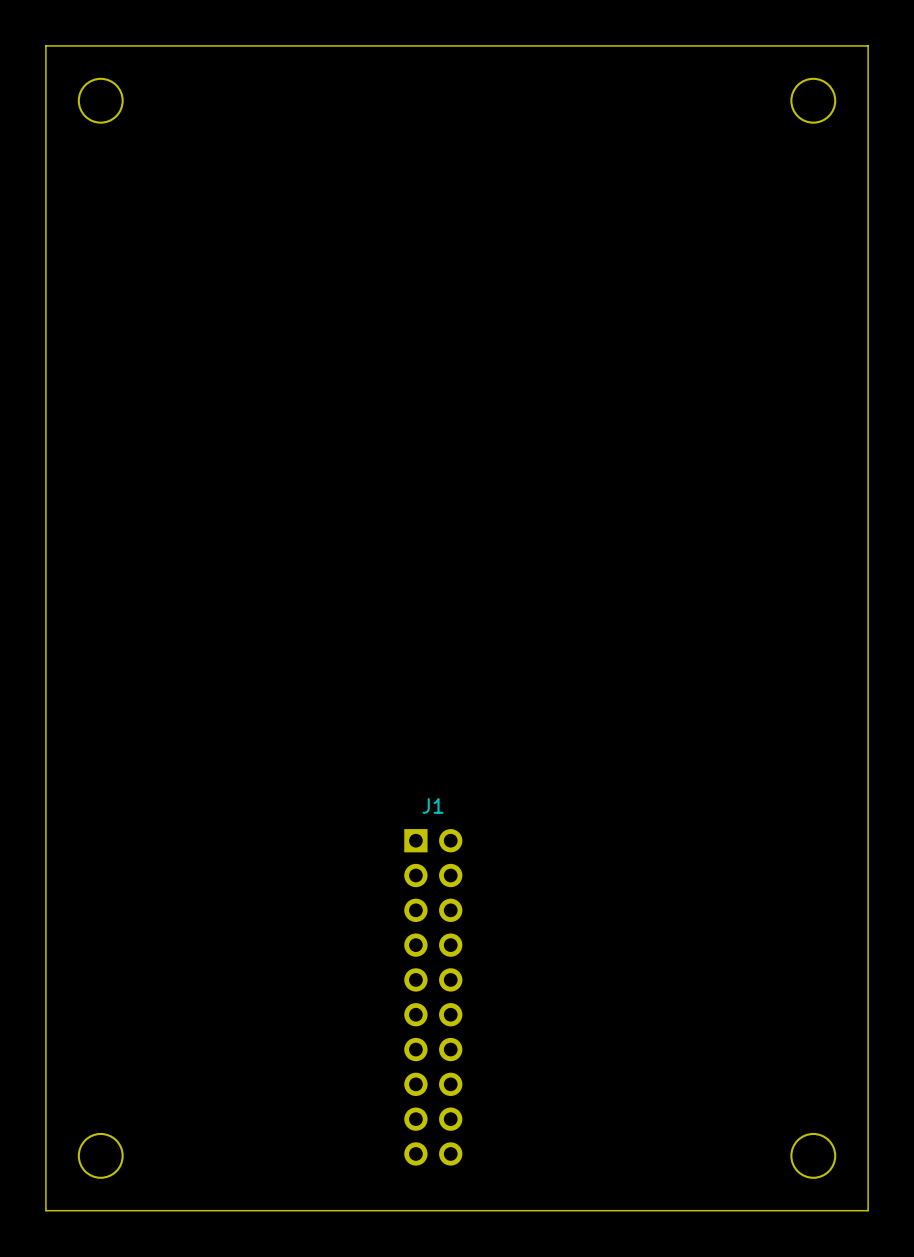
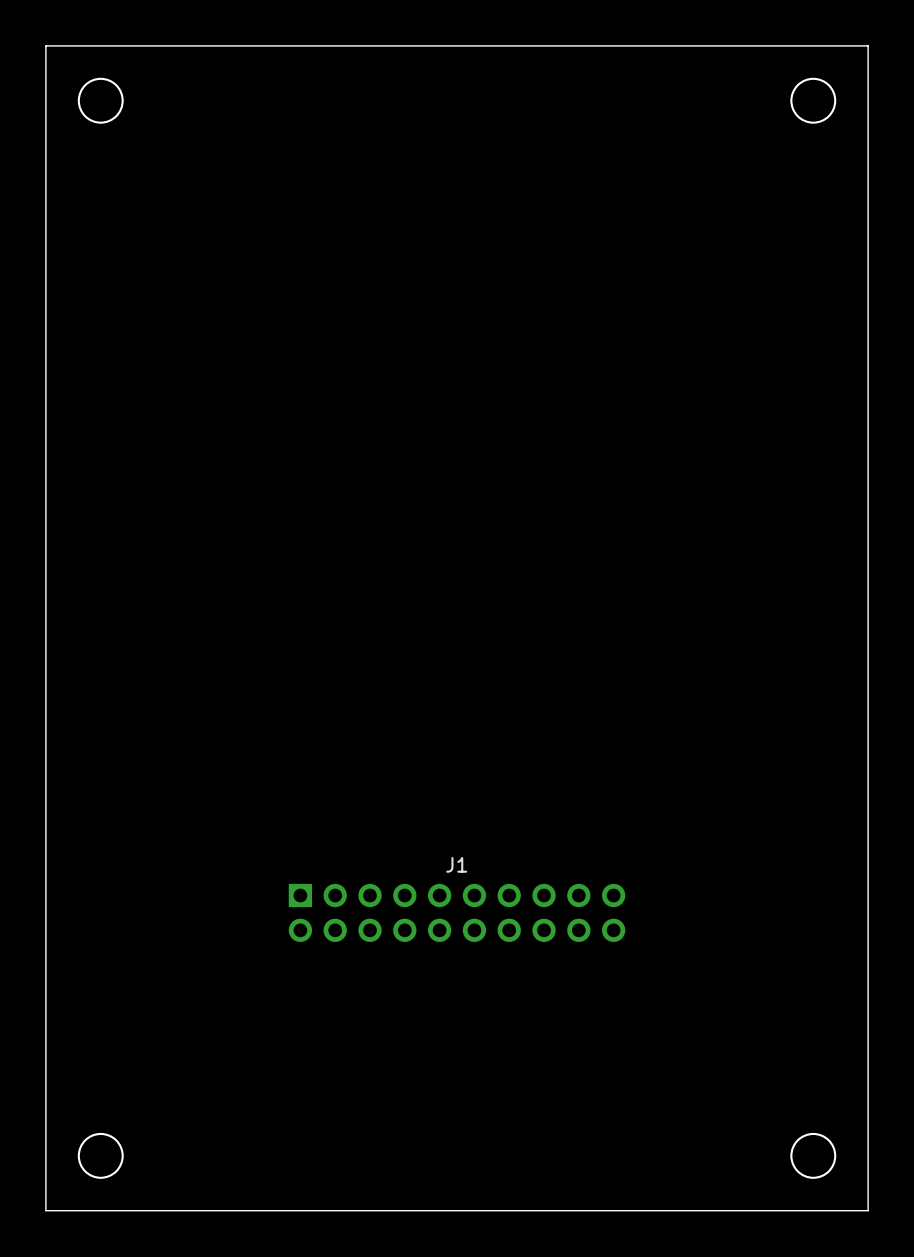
J1 name position: J1 (432, 805) -> J1 (456, 864)
J1 footprint: [404, 829, 463, 1166] -> [288, 883, 626, 942]

